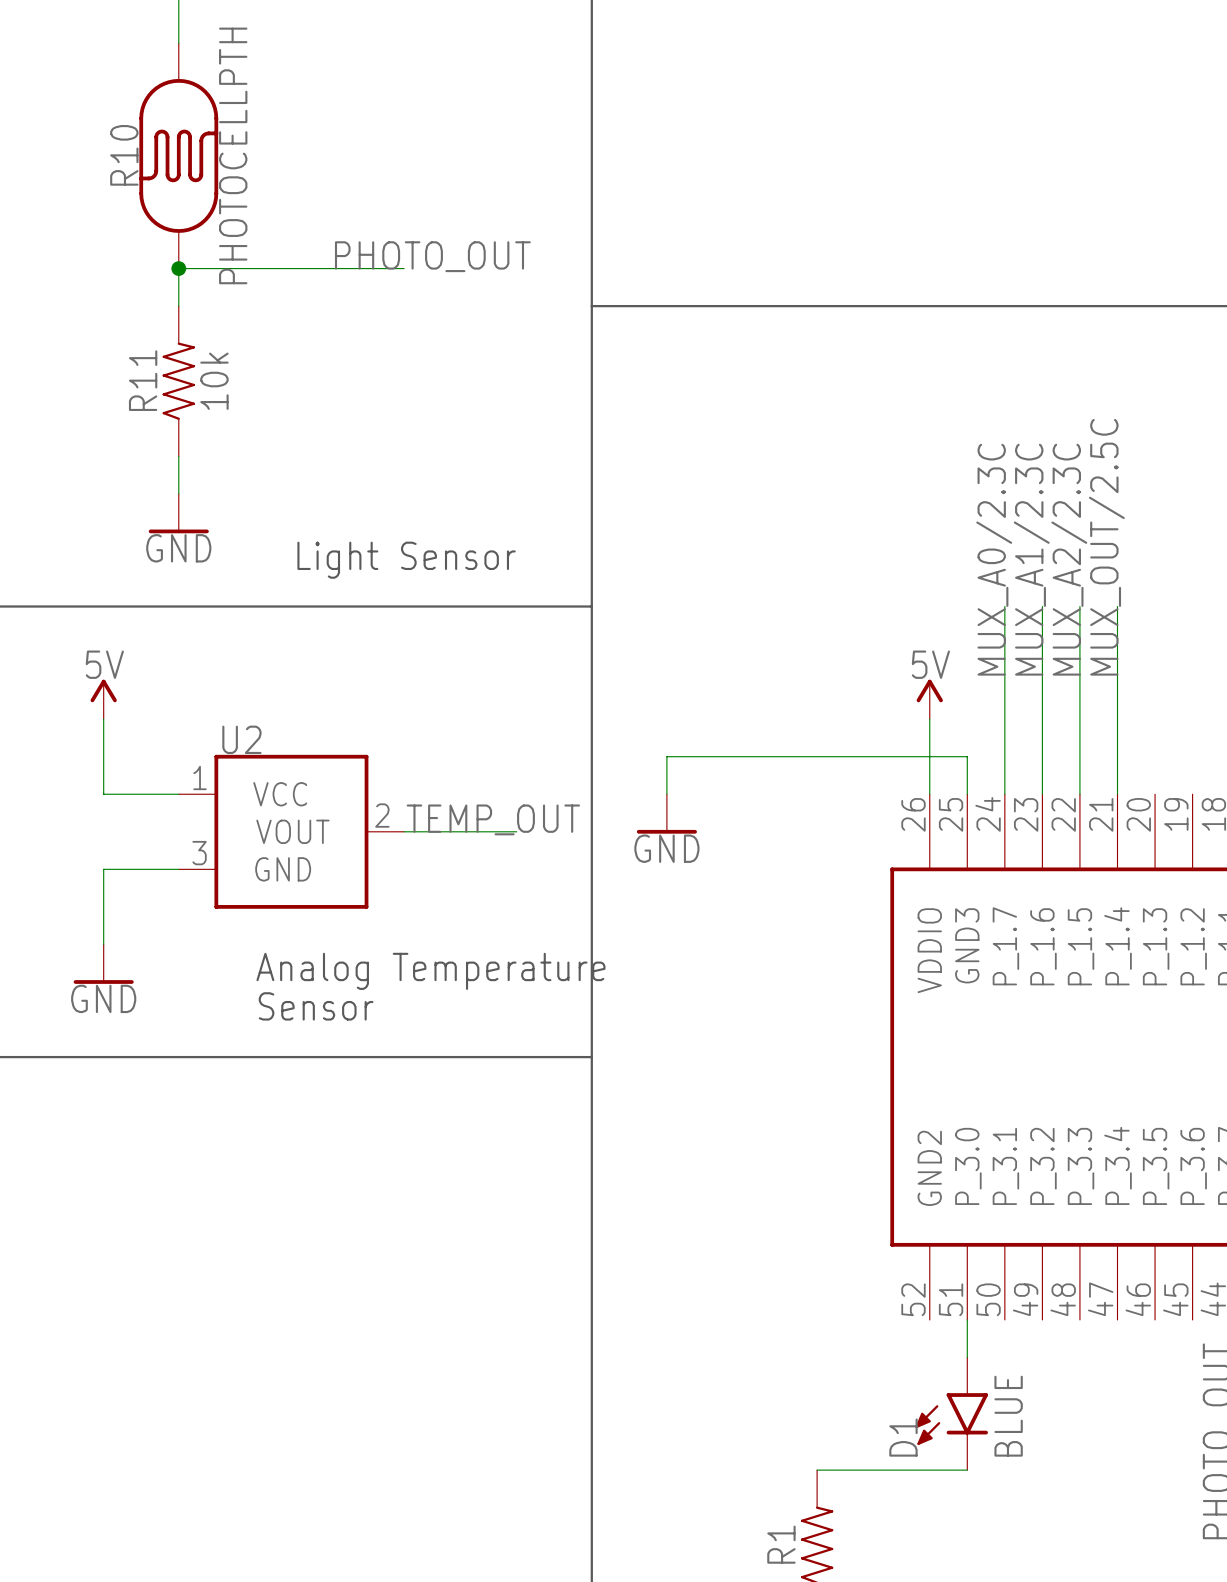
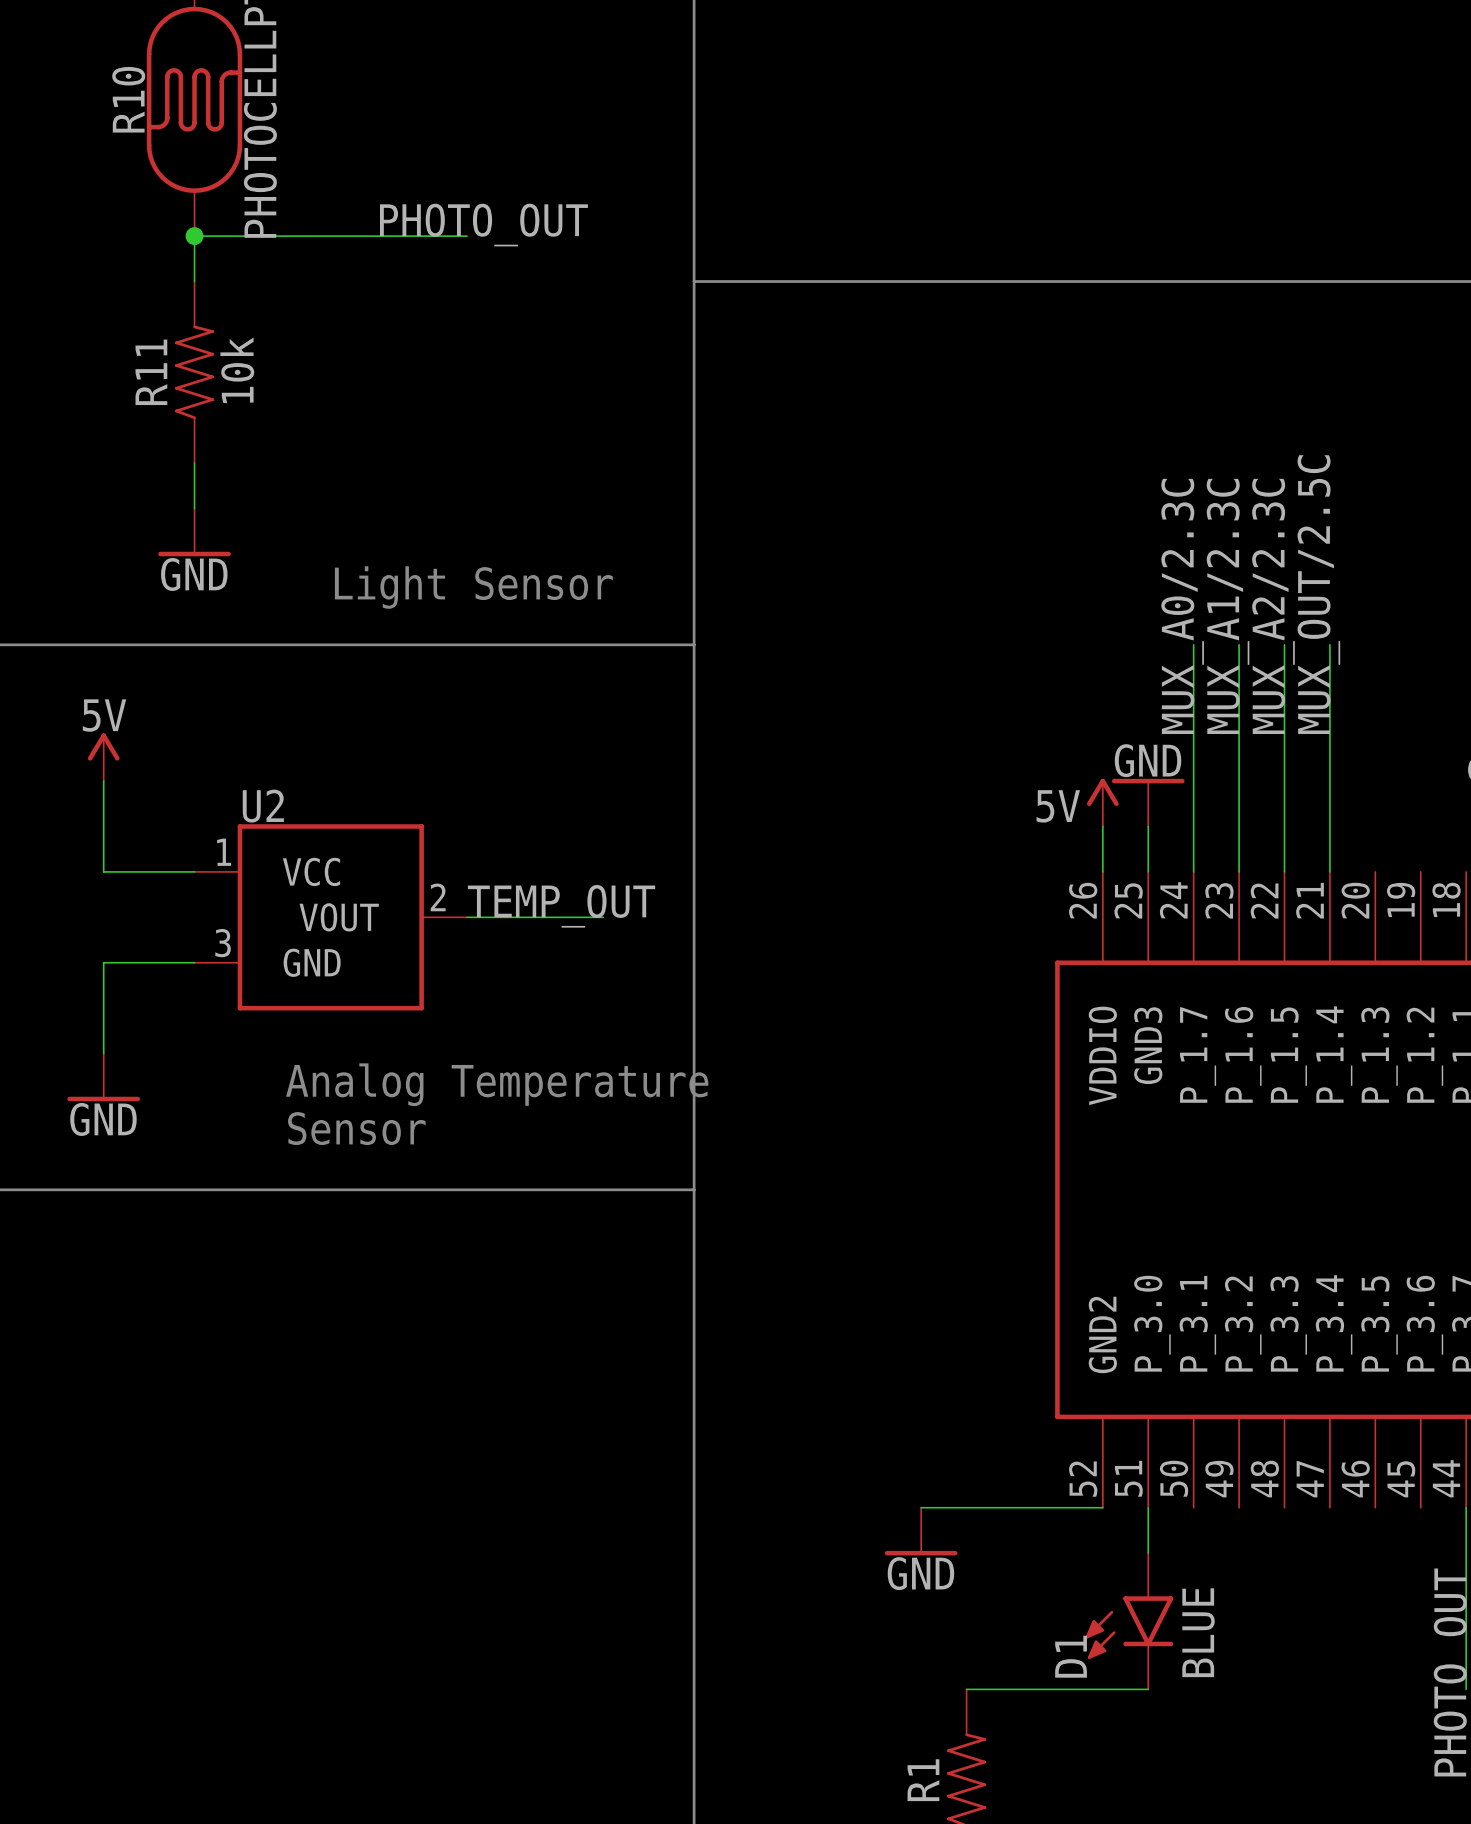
power symbol text position: 5V (930, 664) -> 5V (1058, 806)
power symbol position: 5V (929, 699) -> 5V (1102, 802)
power symbol: none -> GND (1148, 802)
wire: (967, 756) (666, 756) (666, 794) -> none
power symbol: GND (666, 813) -> none
wire: none -> (921, 1507) (1102, 1507)
power symbol: none -> GND (921, 1531)

